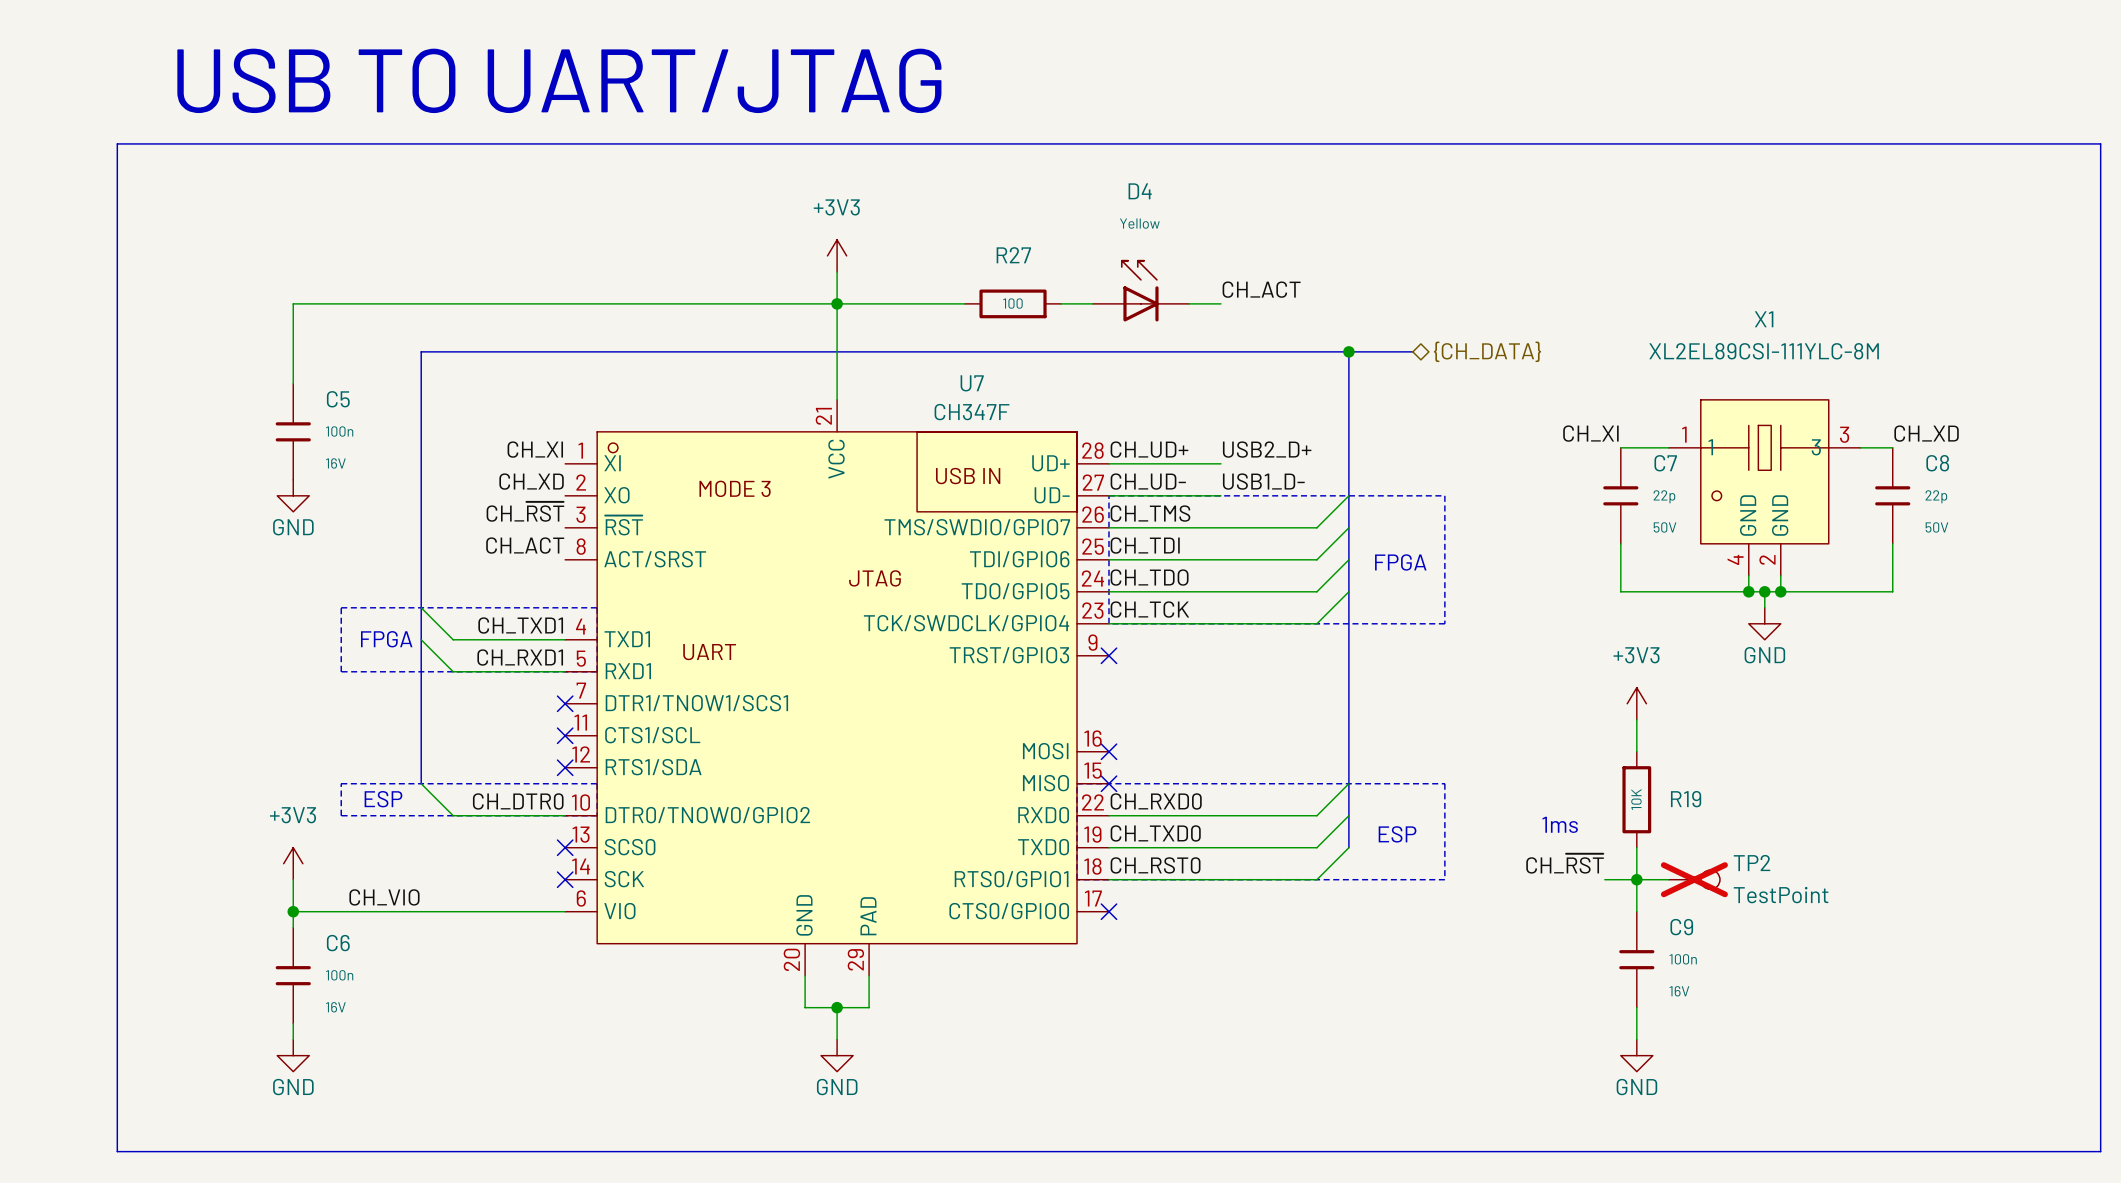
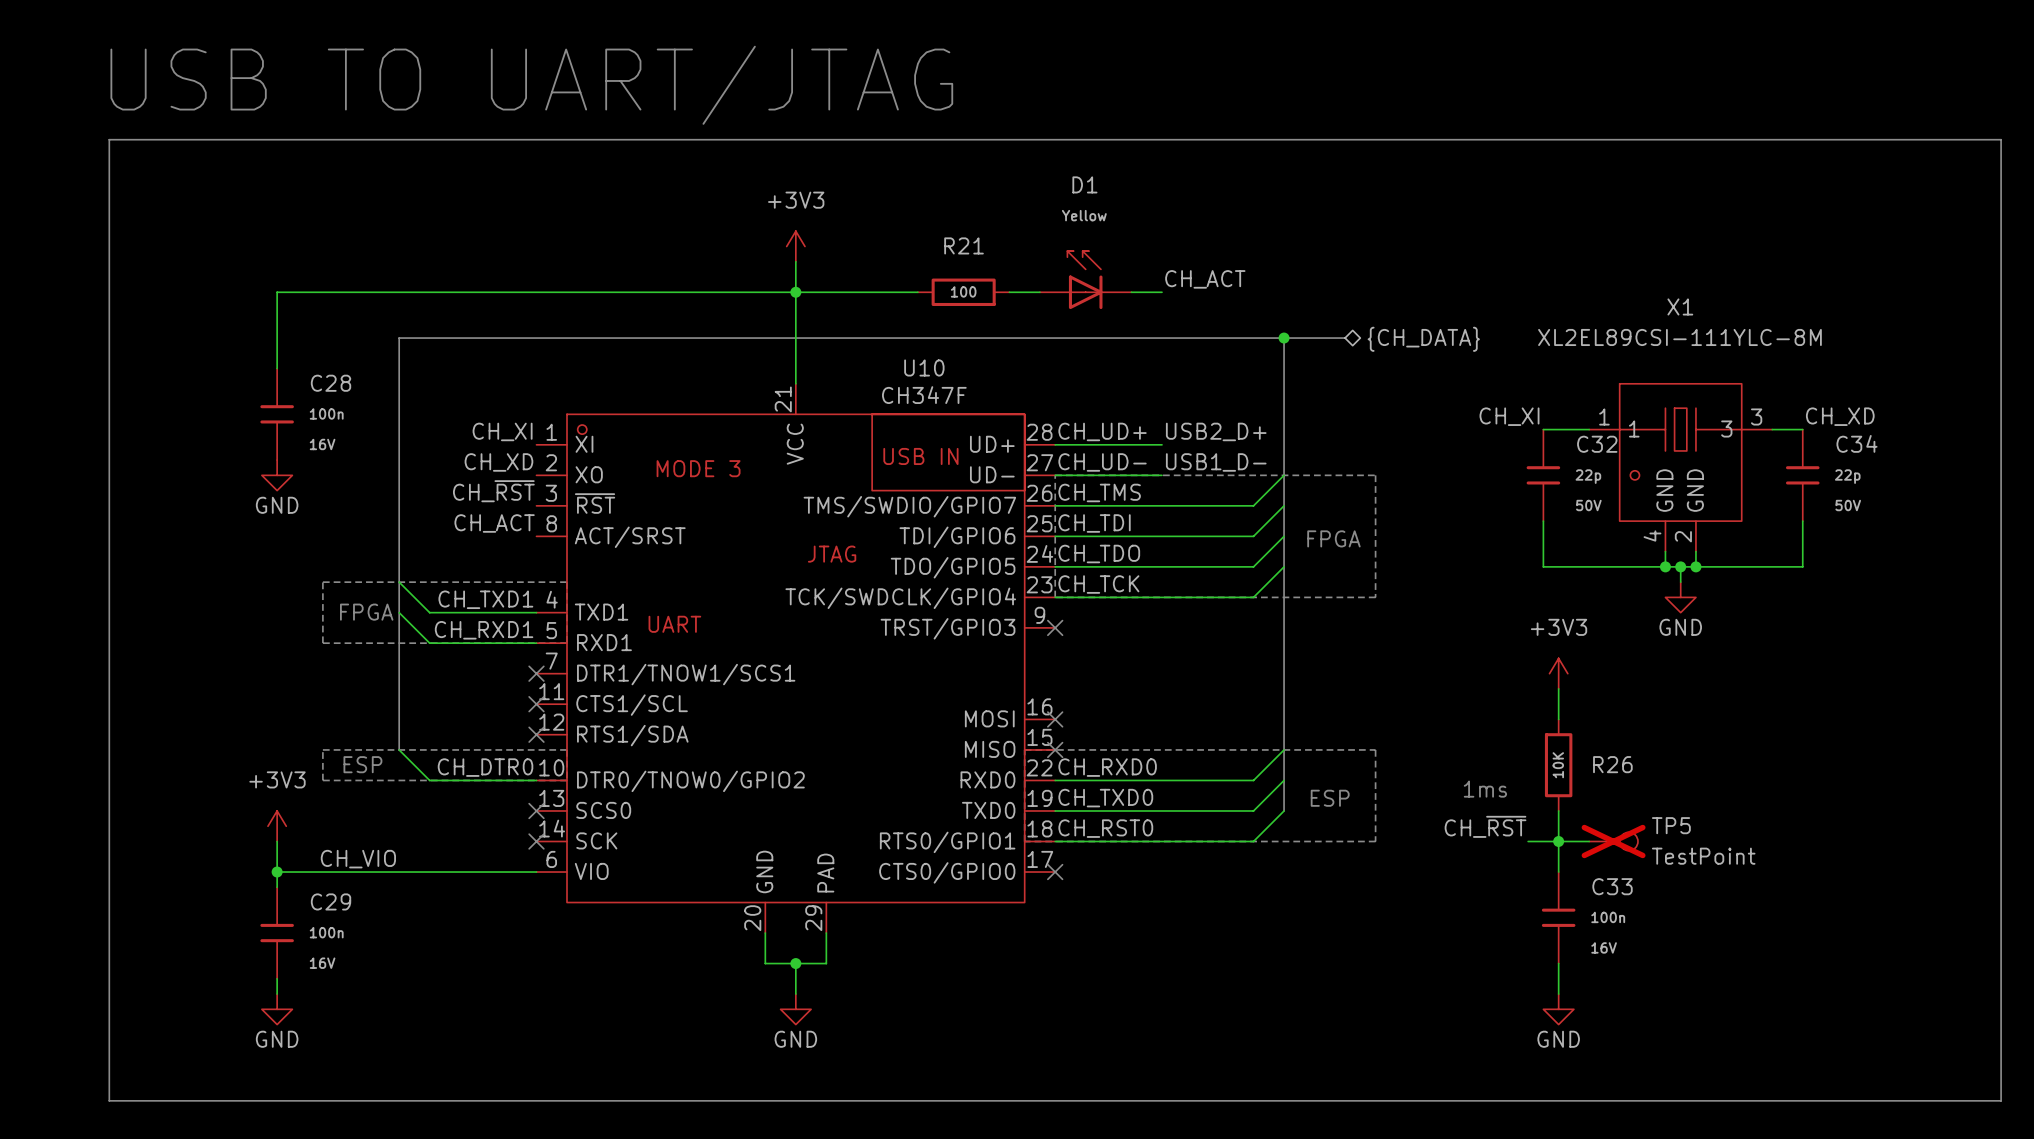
D4 name: D4 (1140, 191) -> D1 (1084, 184)
R27 name: R27 (1013, 255) -> R21 (964, 245)
U7 name: U7 (972, 383) -> U10 (924, 367)
C5 name: C5 (338, 399) -> C28 (331, 383)
C7 name: C7 (1665, 463) -> C32 (1597, 444)
C8 name: C8 (1937, 463) -> C34 (1856, 443)
R19 name: R19 (1686, 799) -> R26 (1612, 764)
TP2 name: TP2 (1752, 863) -> TP5 (1671, 825)
C9 name: C9 (1681, 927) -> C33 (1612, 886)
C6 name: C6 (338, 943) -> C29 (331, 901)

